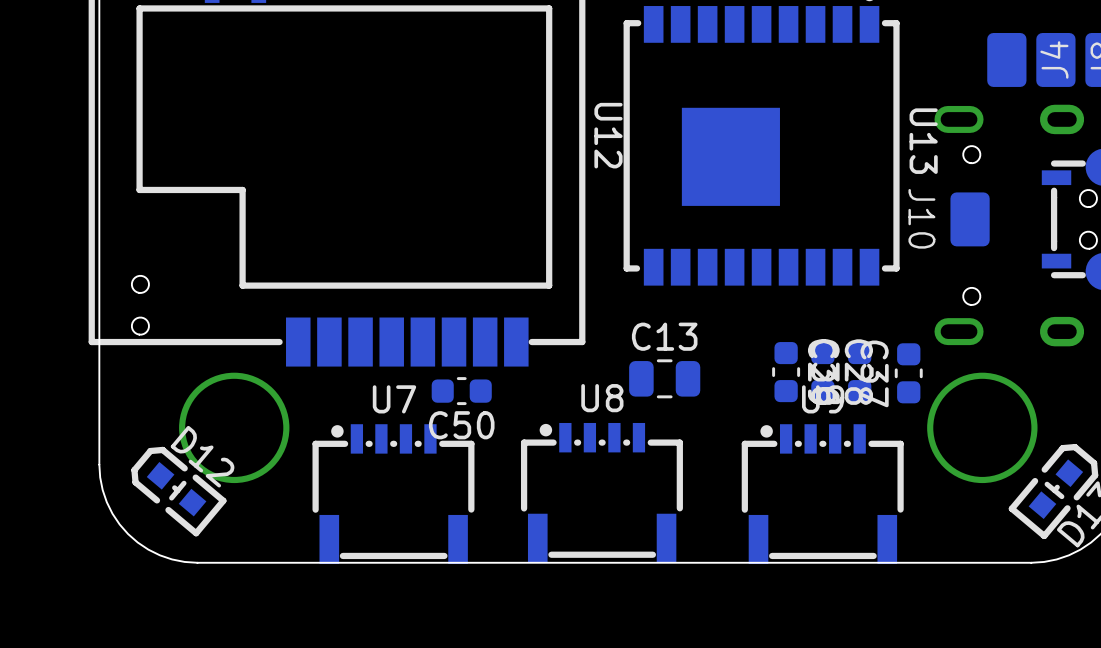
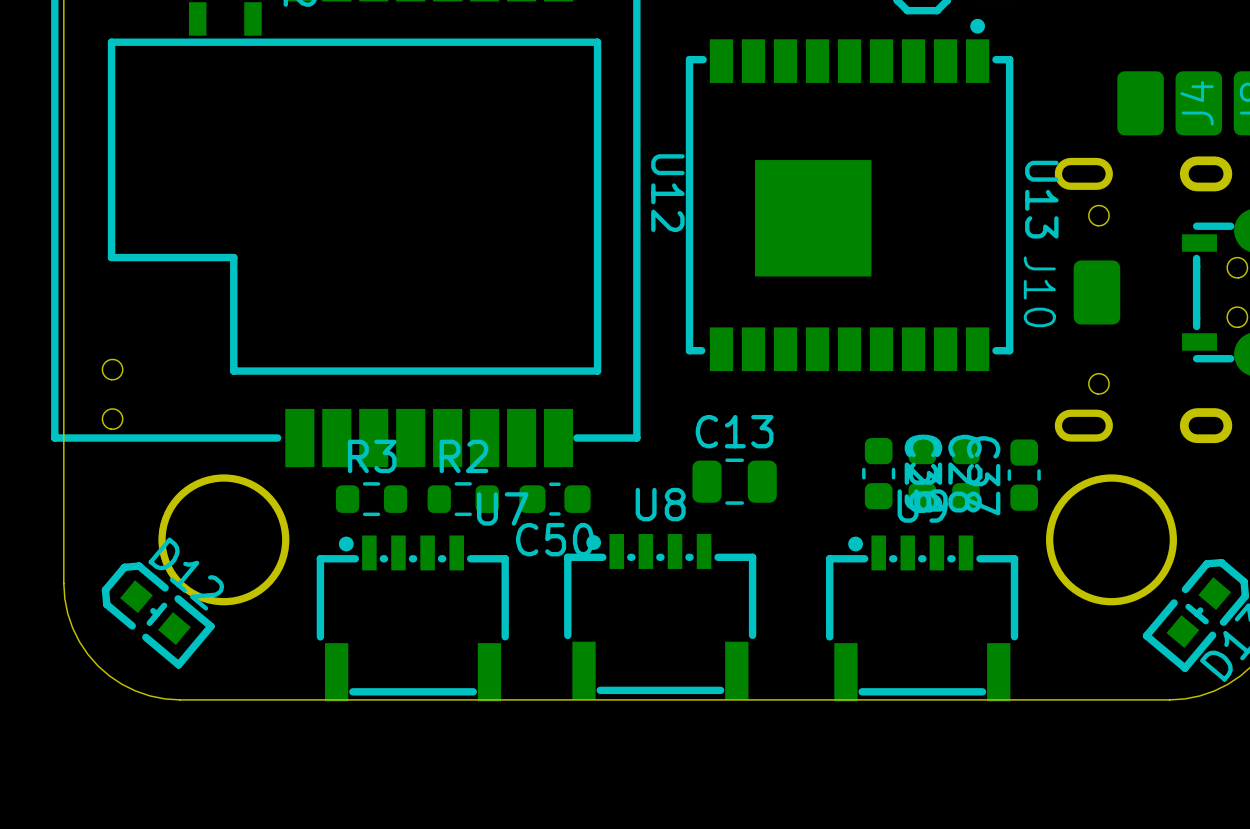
C50 position: (461, 391) -> (554, 499)
R3: none -> (371, 499)
R2: none -> (463, 499)
U7 name position: U7 (394, 399) -> U7 (502, 508)

